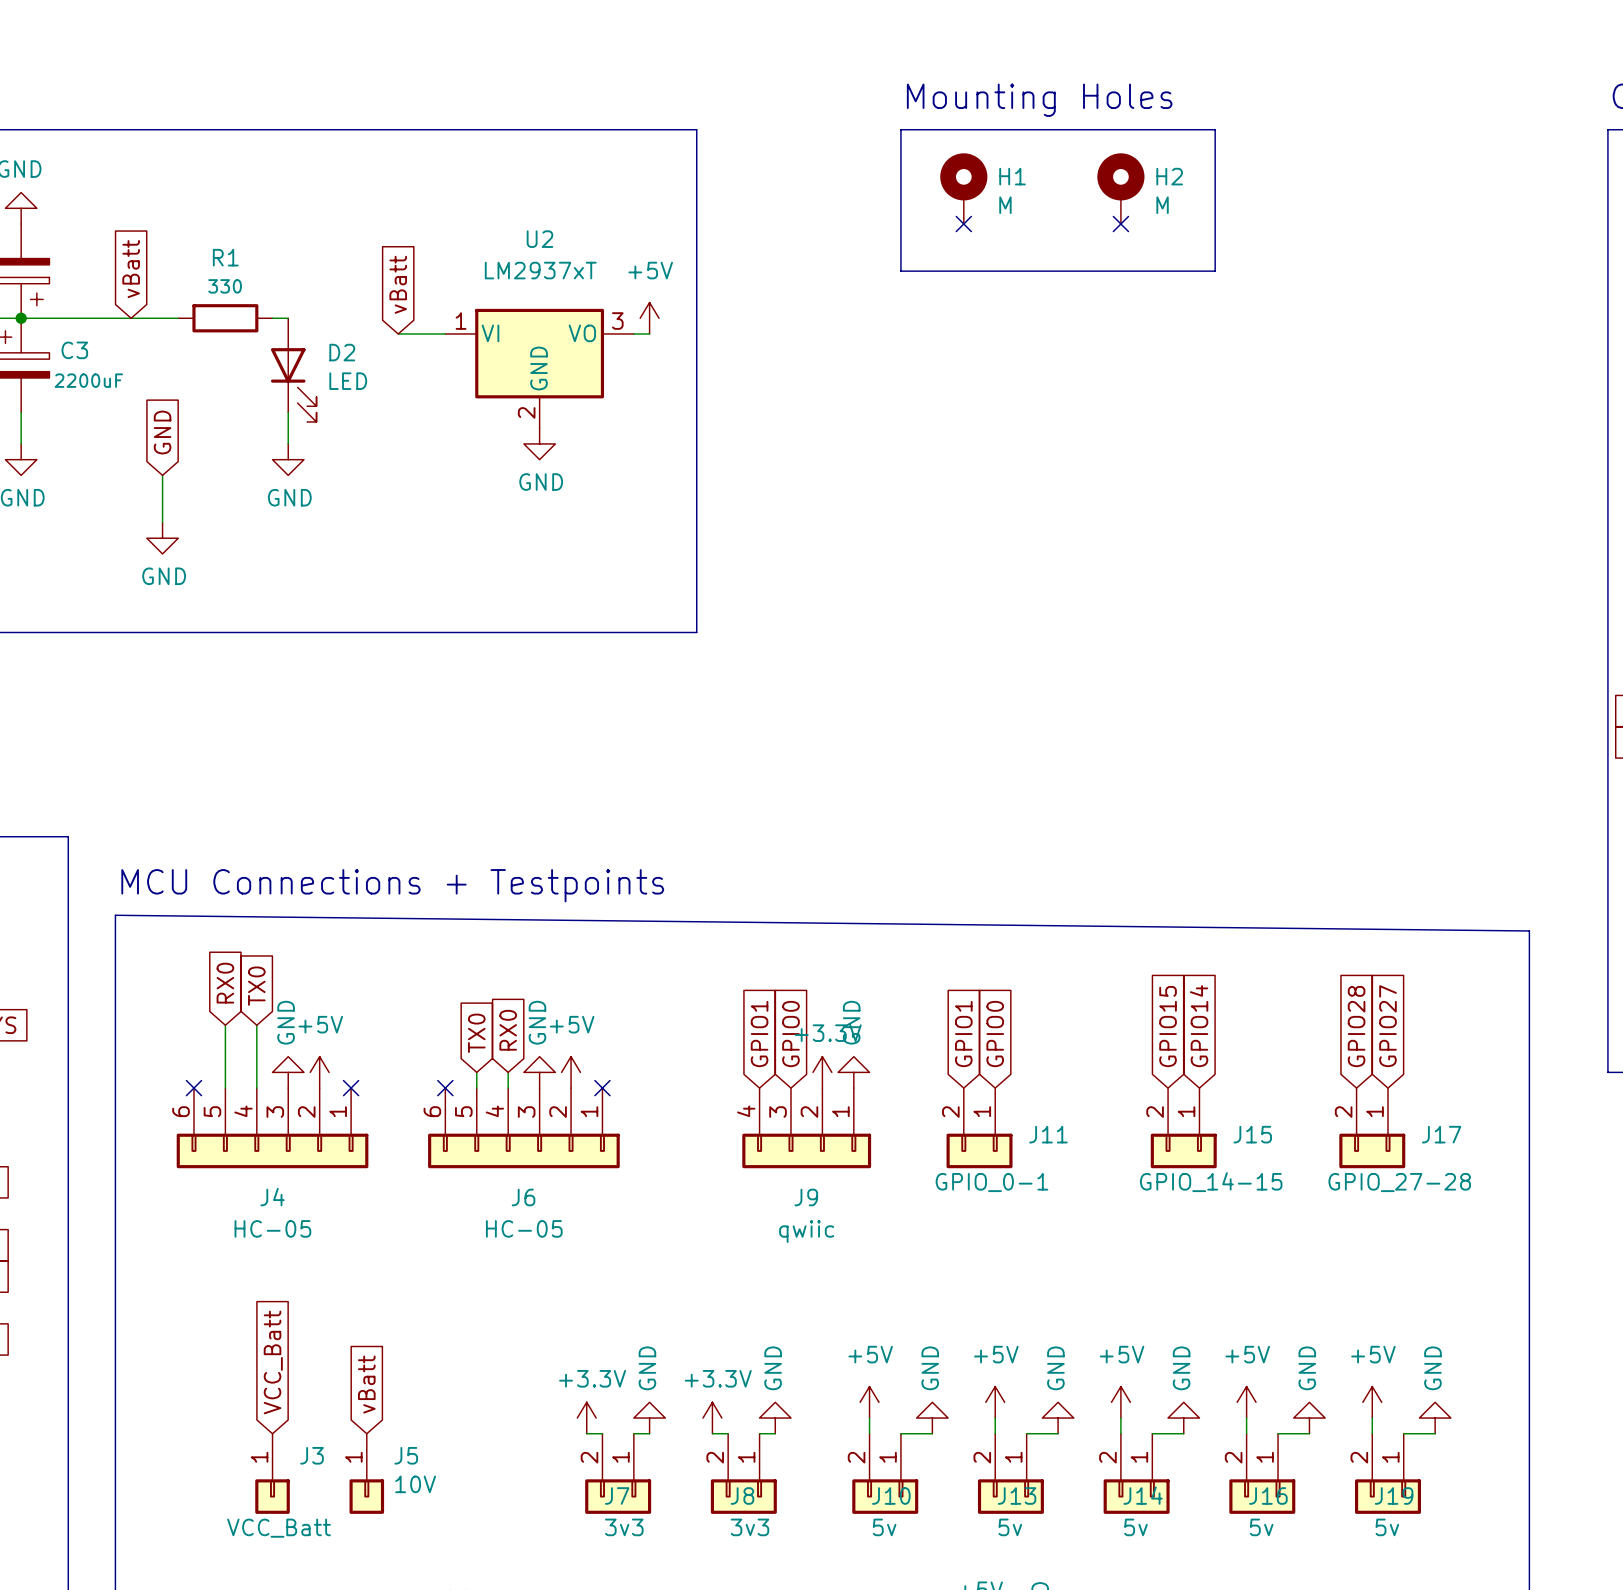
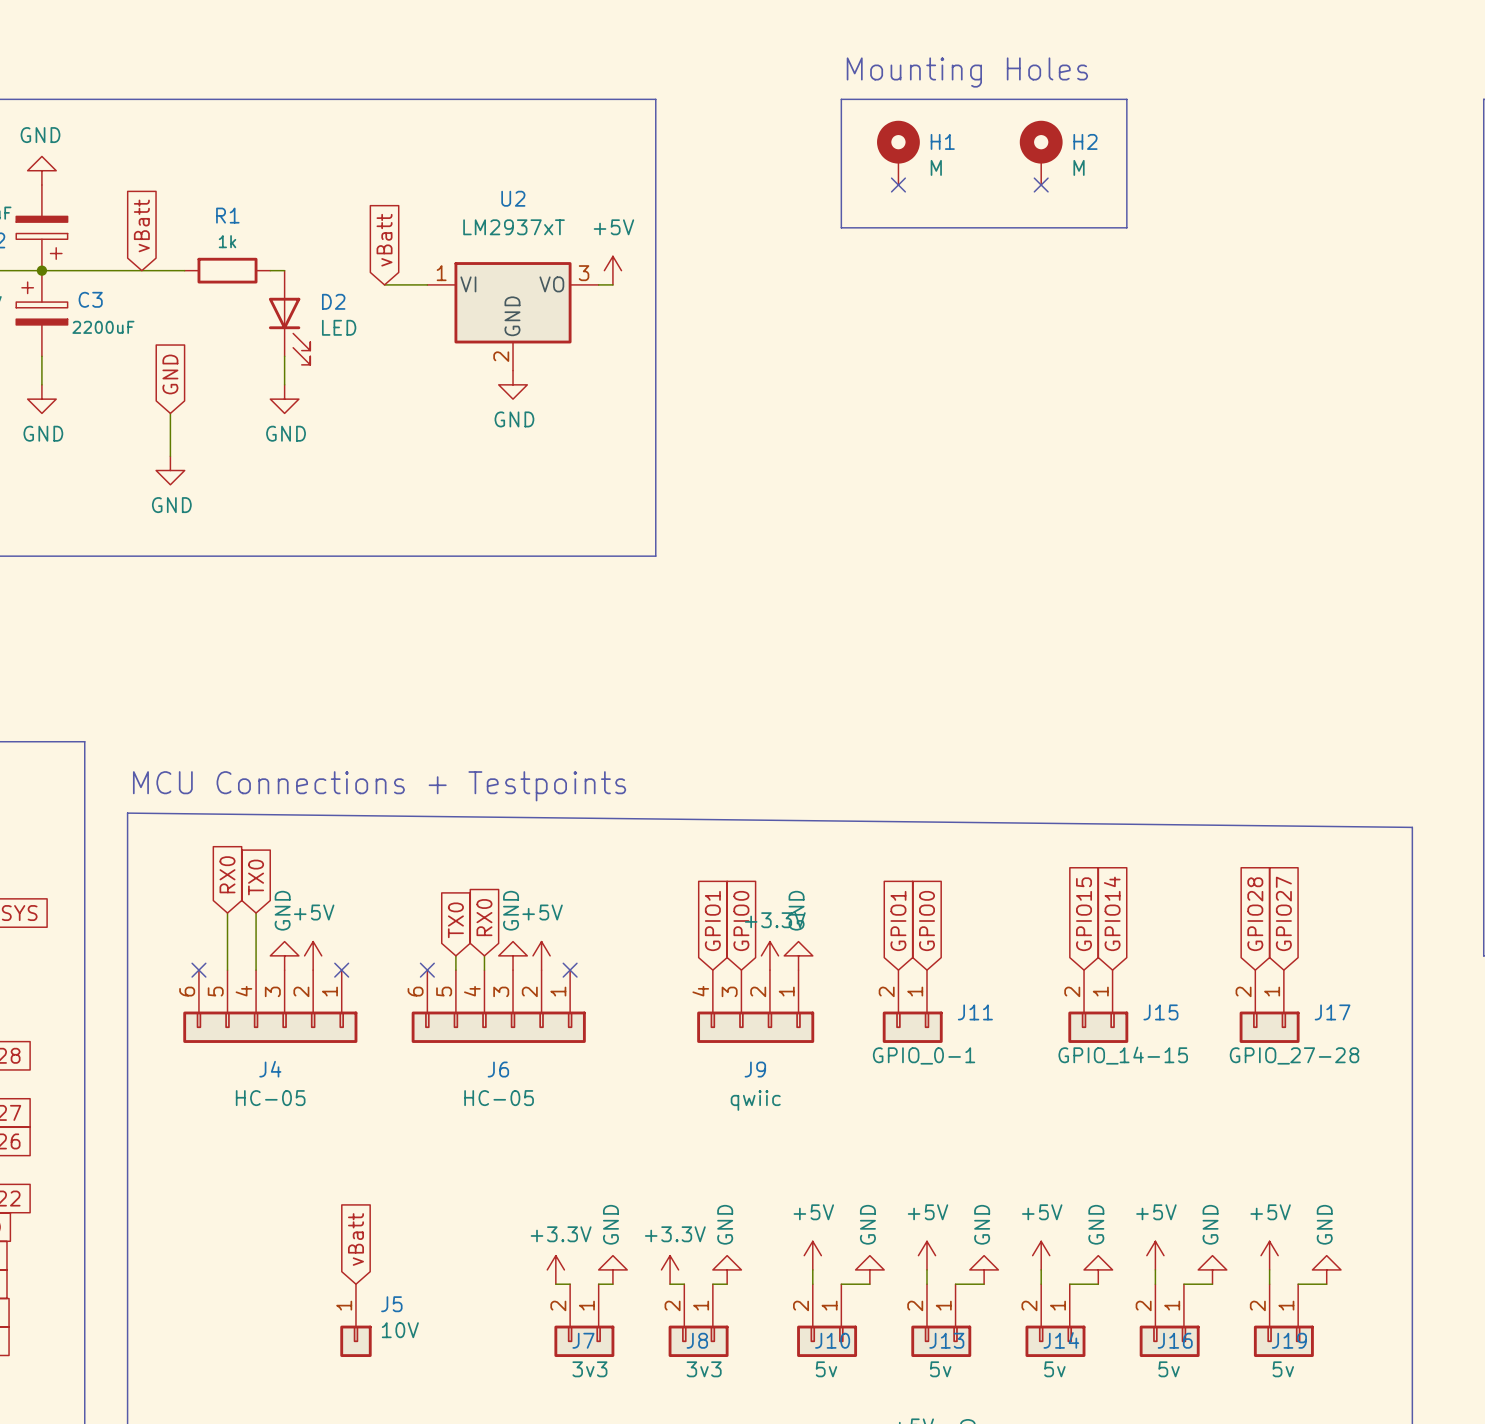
R1 value: 330 (225, 286) -> 1k (227, 241)
global label: VCC_Batt (273, 1362) -> none
J3: VCC_Batt (272, 1473) -> none

